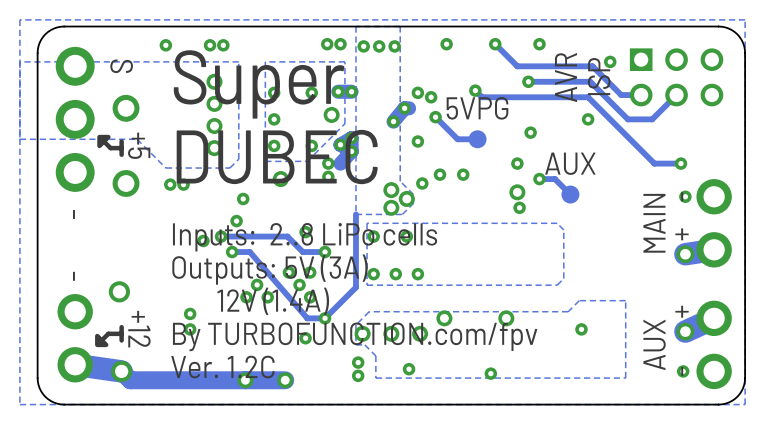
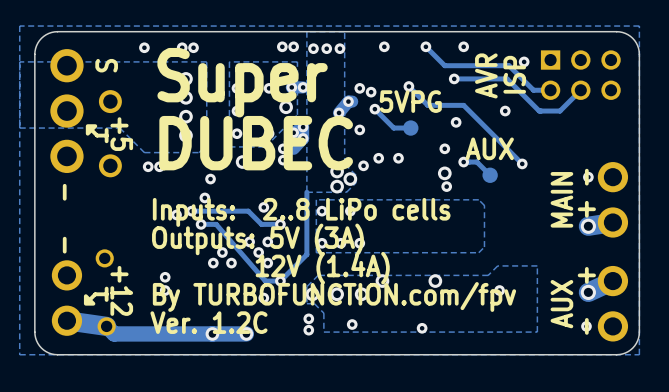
track: (482, 97) (588, 97) (654, 163) (680, 163) -> (414, 92) (427, 105) (463, 105) (522, 163)
via position: (680, 163) -> (522, 163)

